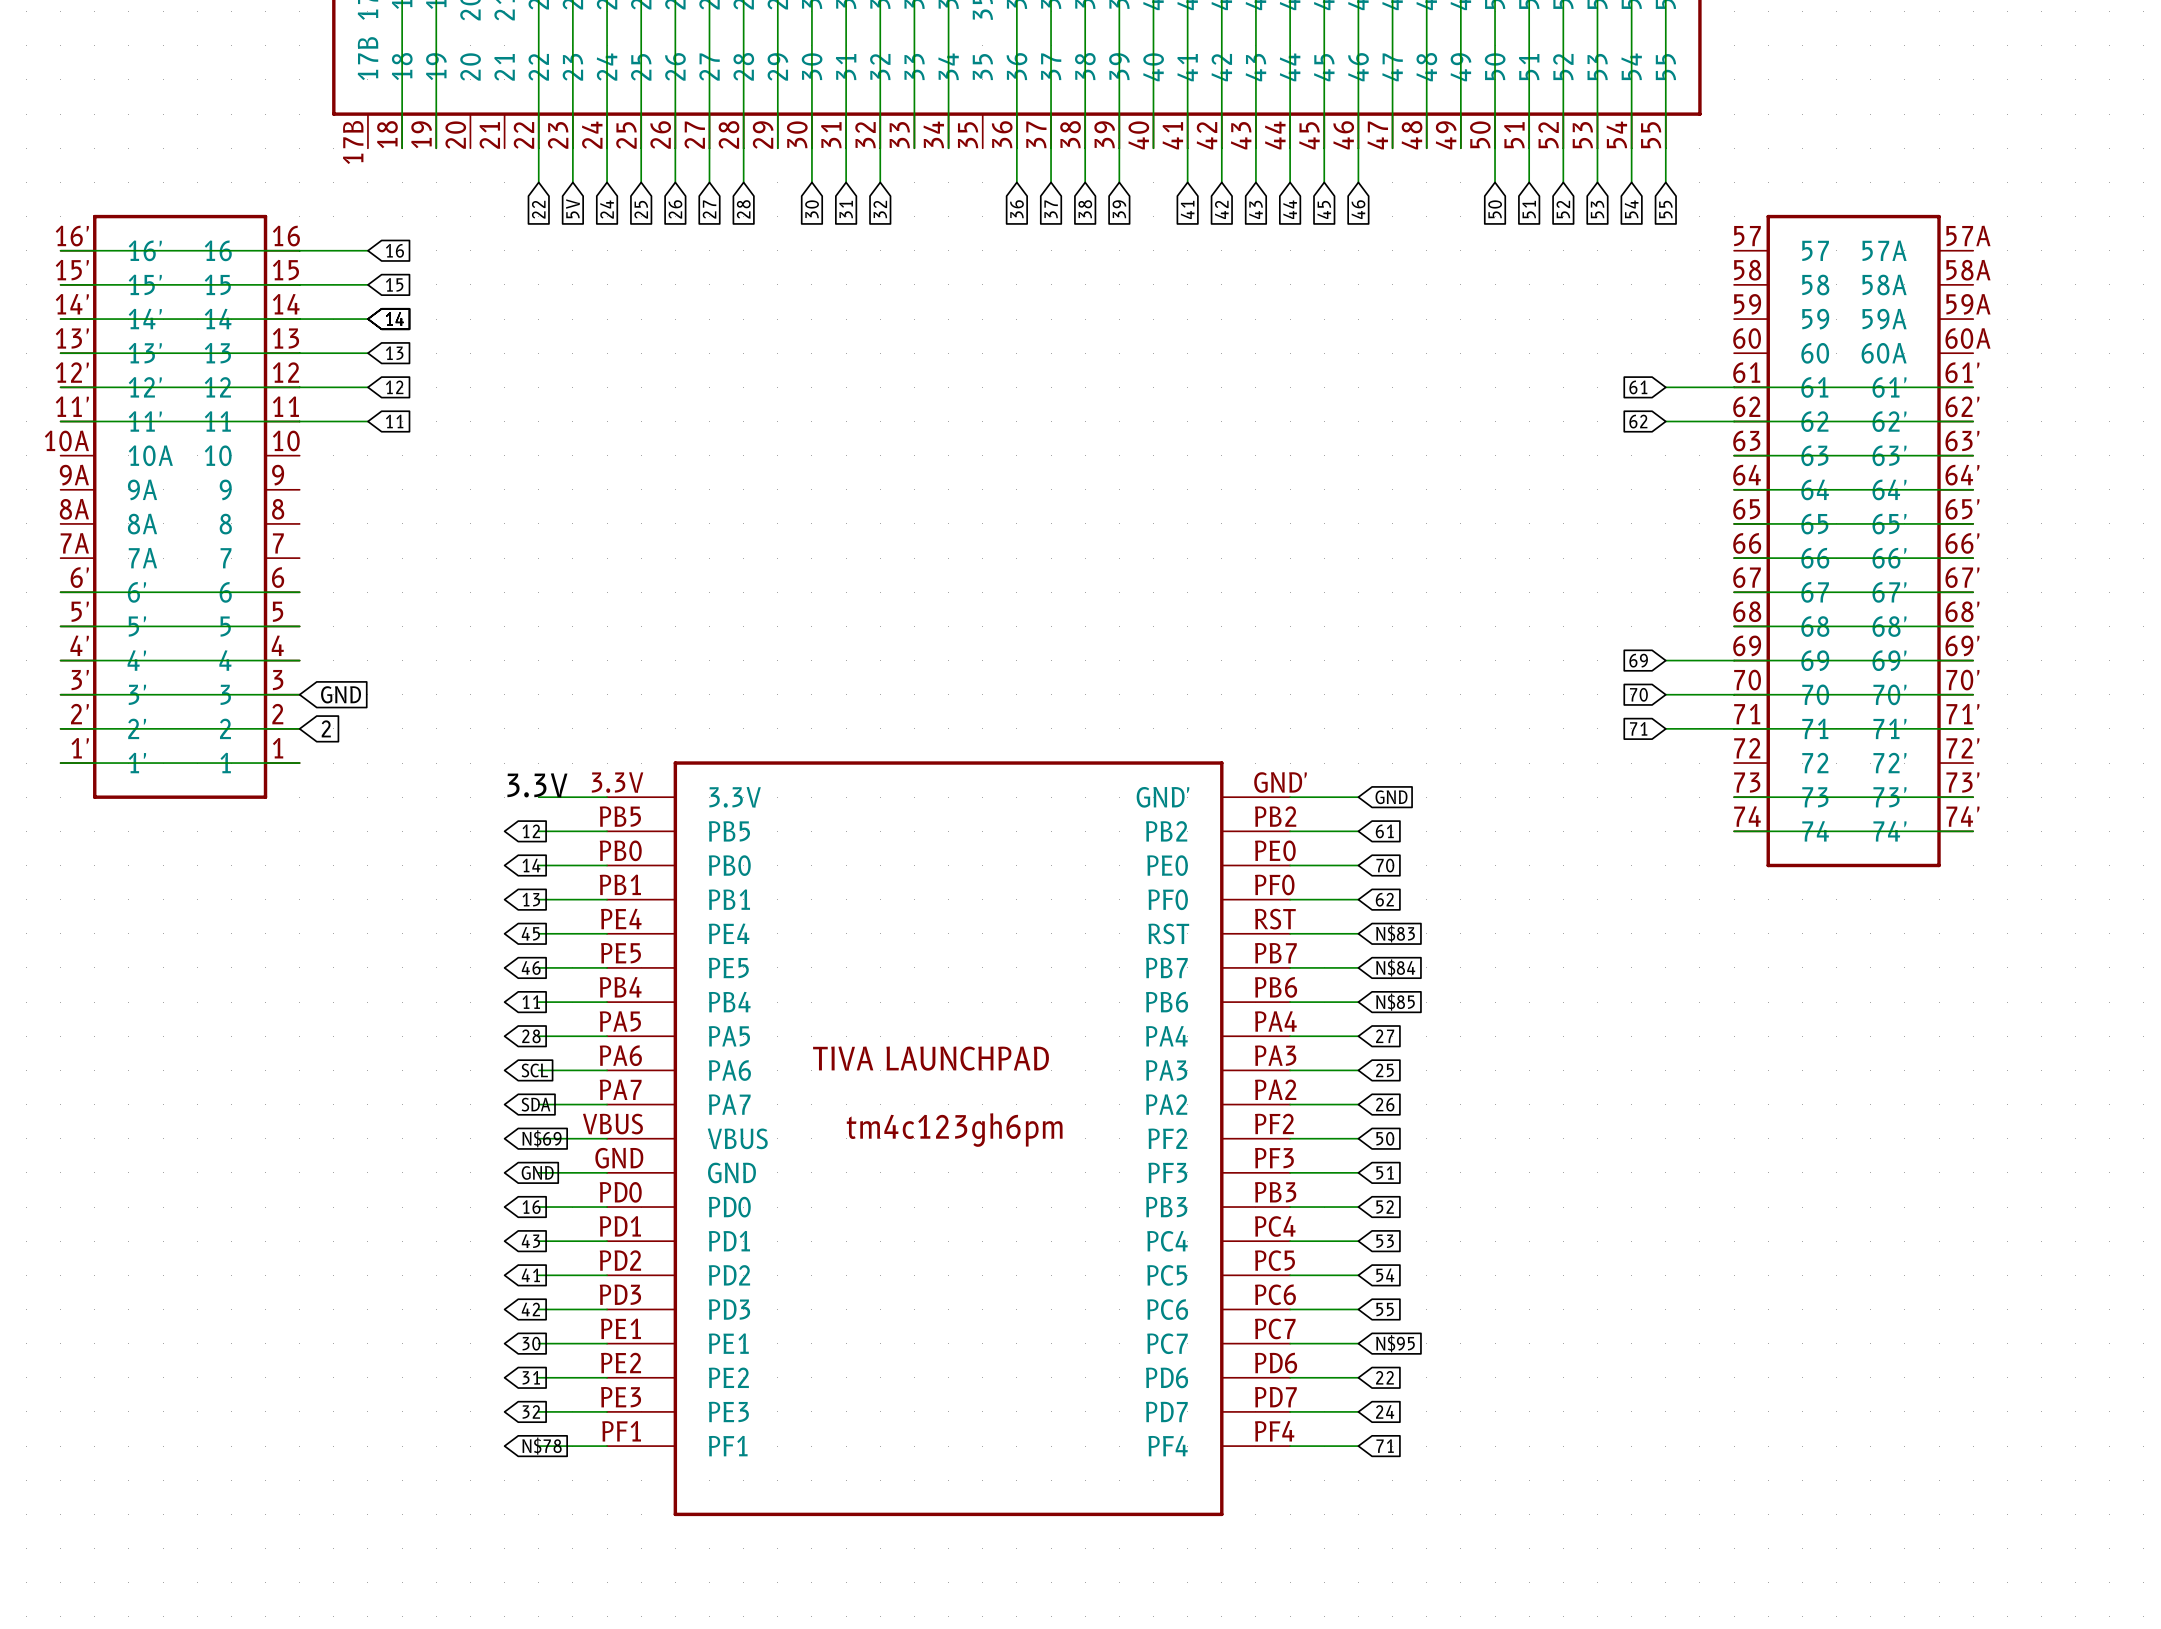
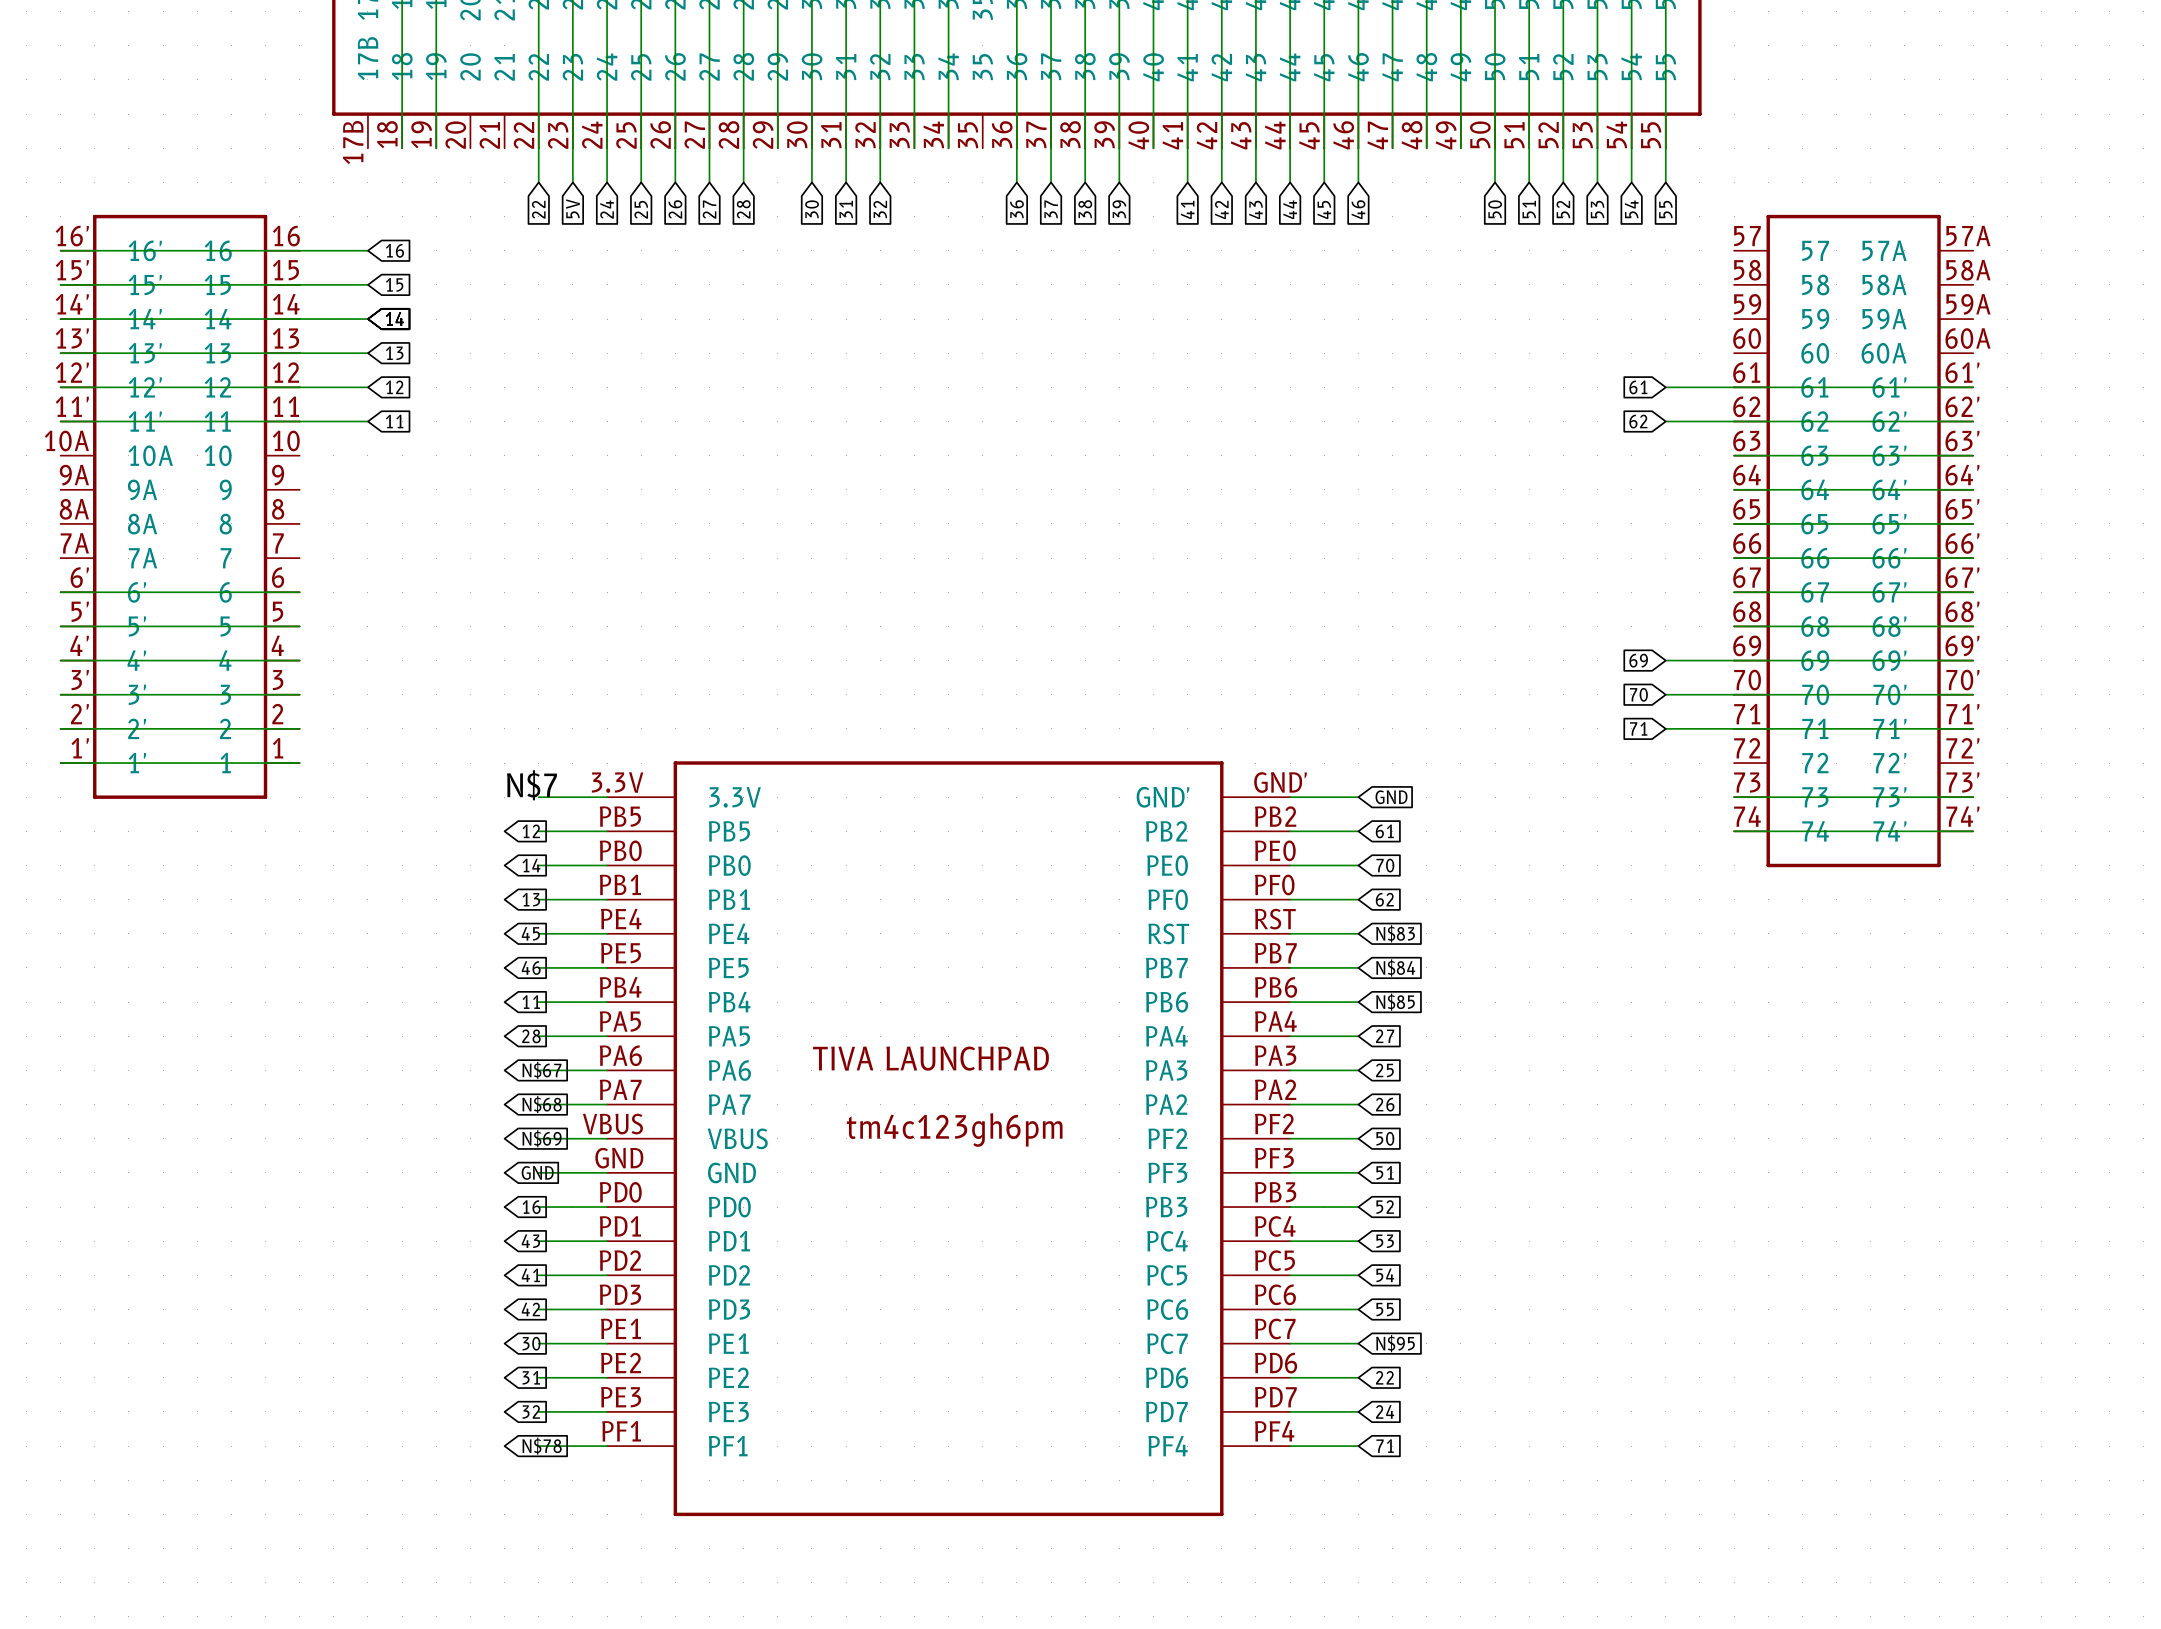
global label: GND (341, 694) -> none
global label: 2 (326, 728) -> none
label: 3.3V (537, 785) -> N$7 (531, 785)
global label: SCL (534, 1070) -> N$67 (541, 1070)
global label: SDA (536, 1104) -> N$68 (542, 1104)

